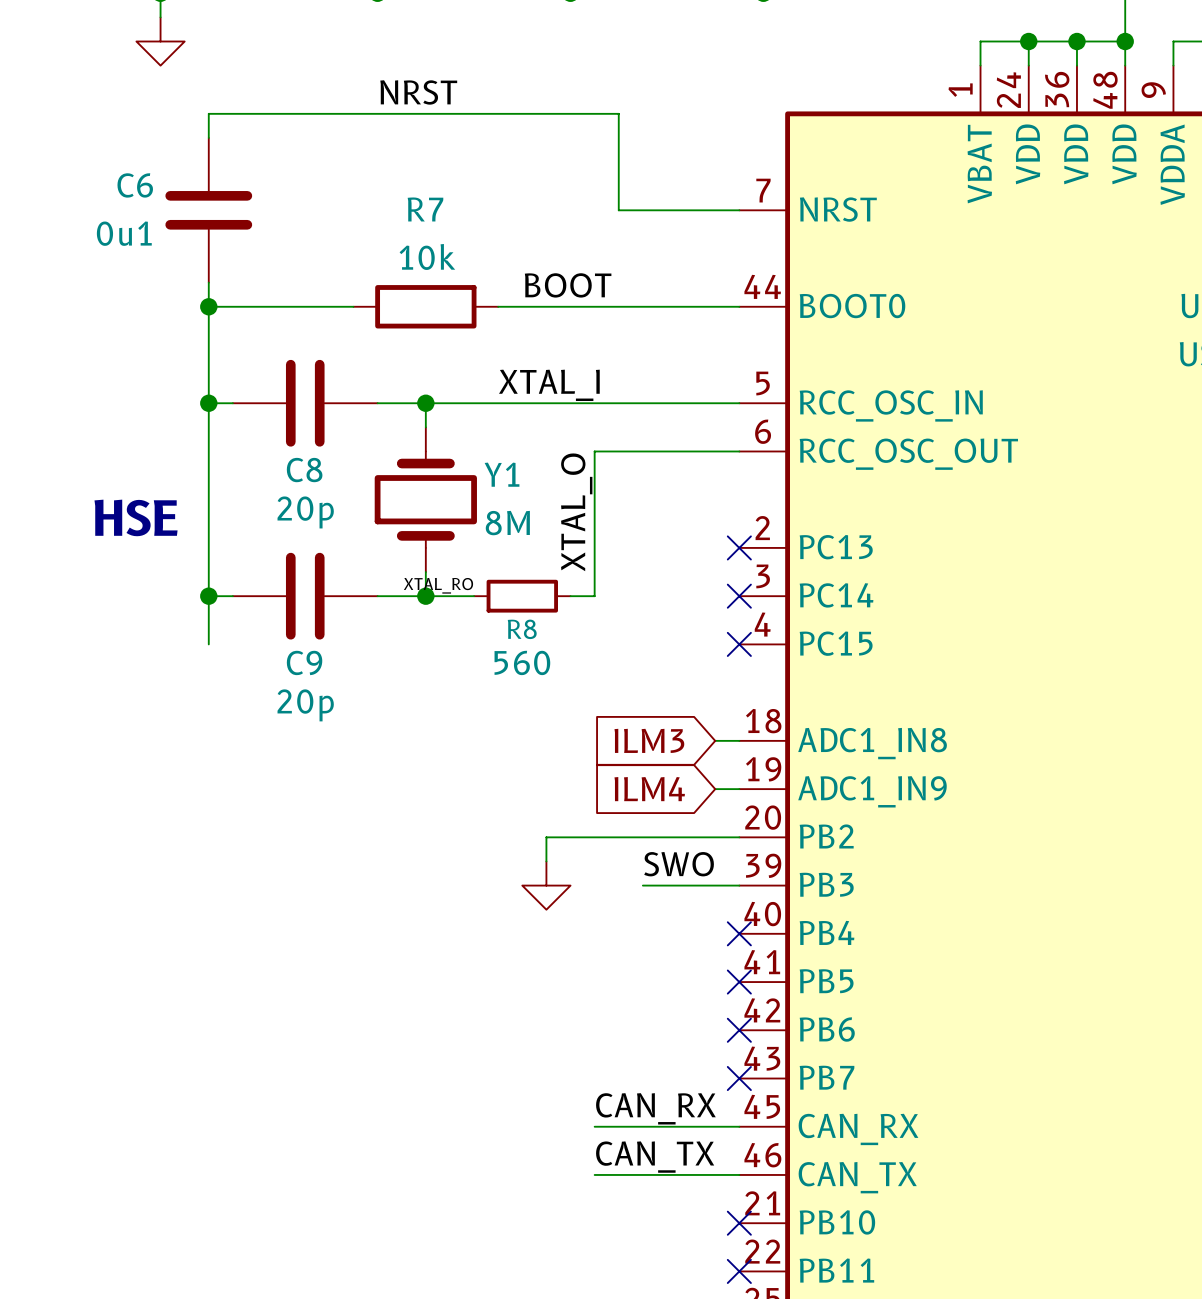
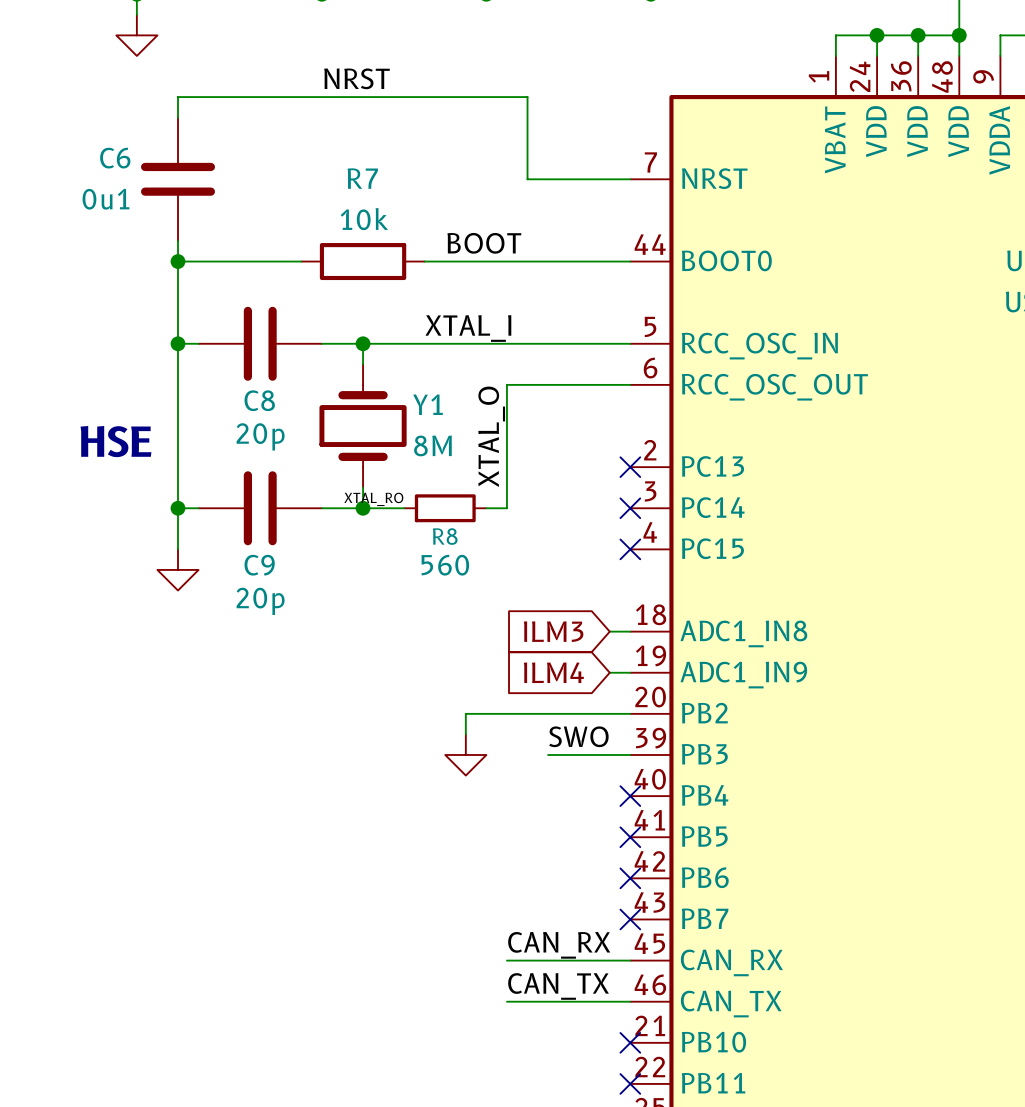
power symbol: none -> (178, 569)

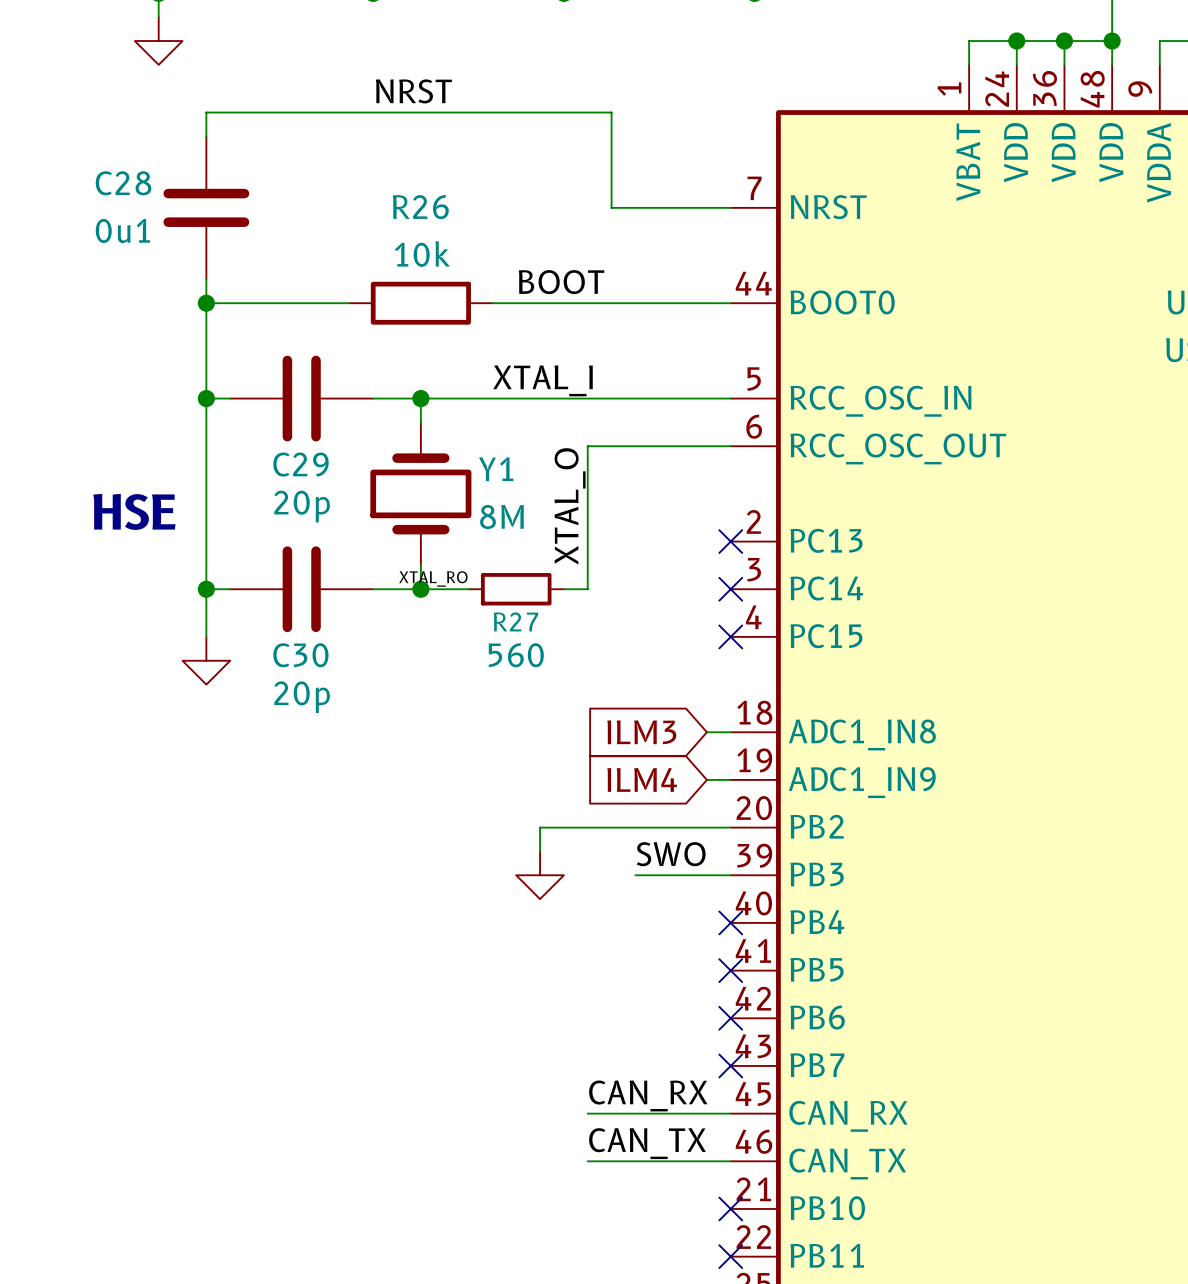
C6 name: C6 (115, 158) -> C28 (123, 183)
R7 name: R7 (362, 178) -> R26 (420, 207)
C8 name: C8 (259, 400) -> C29 (301, 464)
R8 name: R8 (445, 536) -> R27 (515, 621)
C9 name: C9 (259, 565) -> C30 (300, 655)

